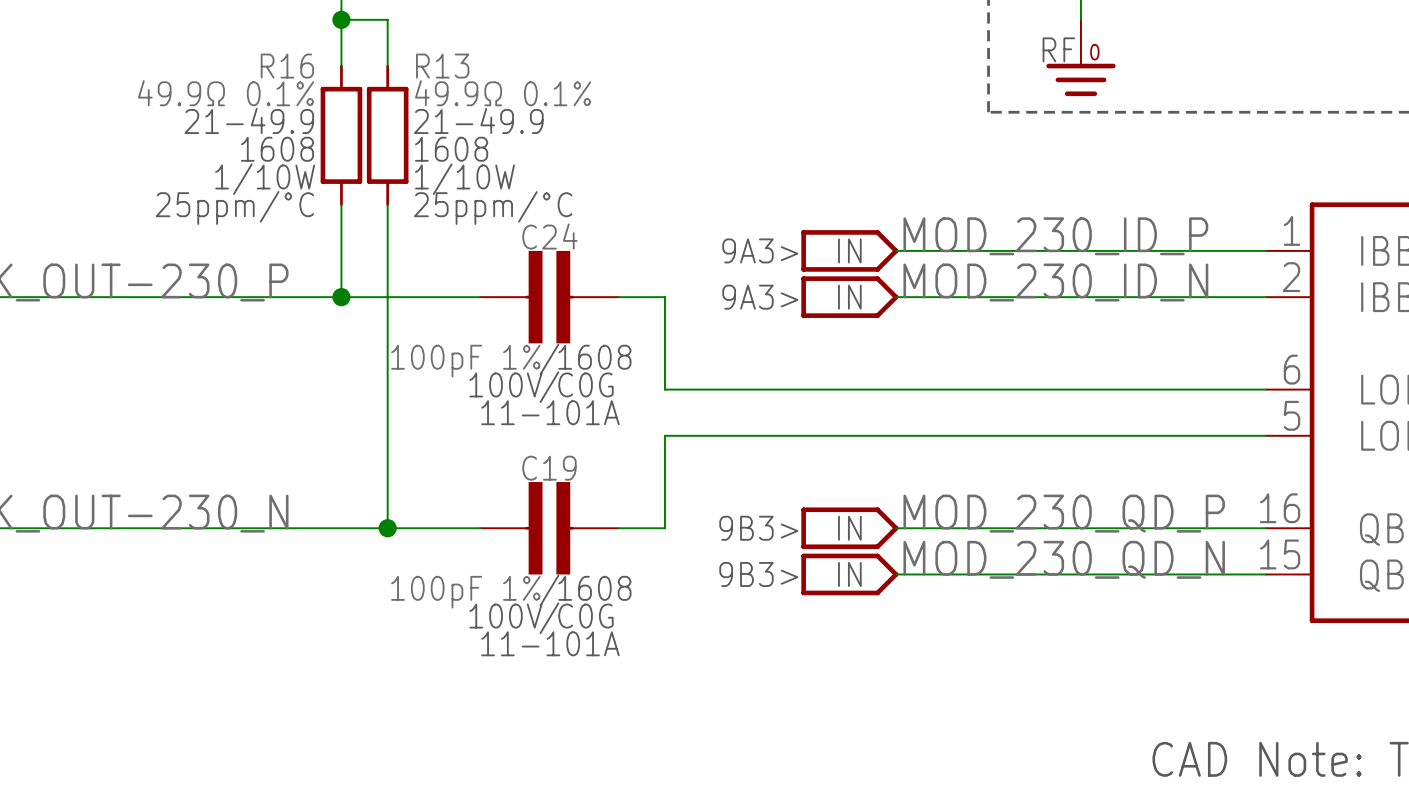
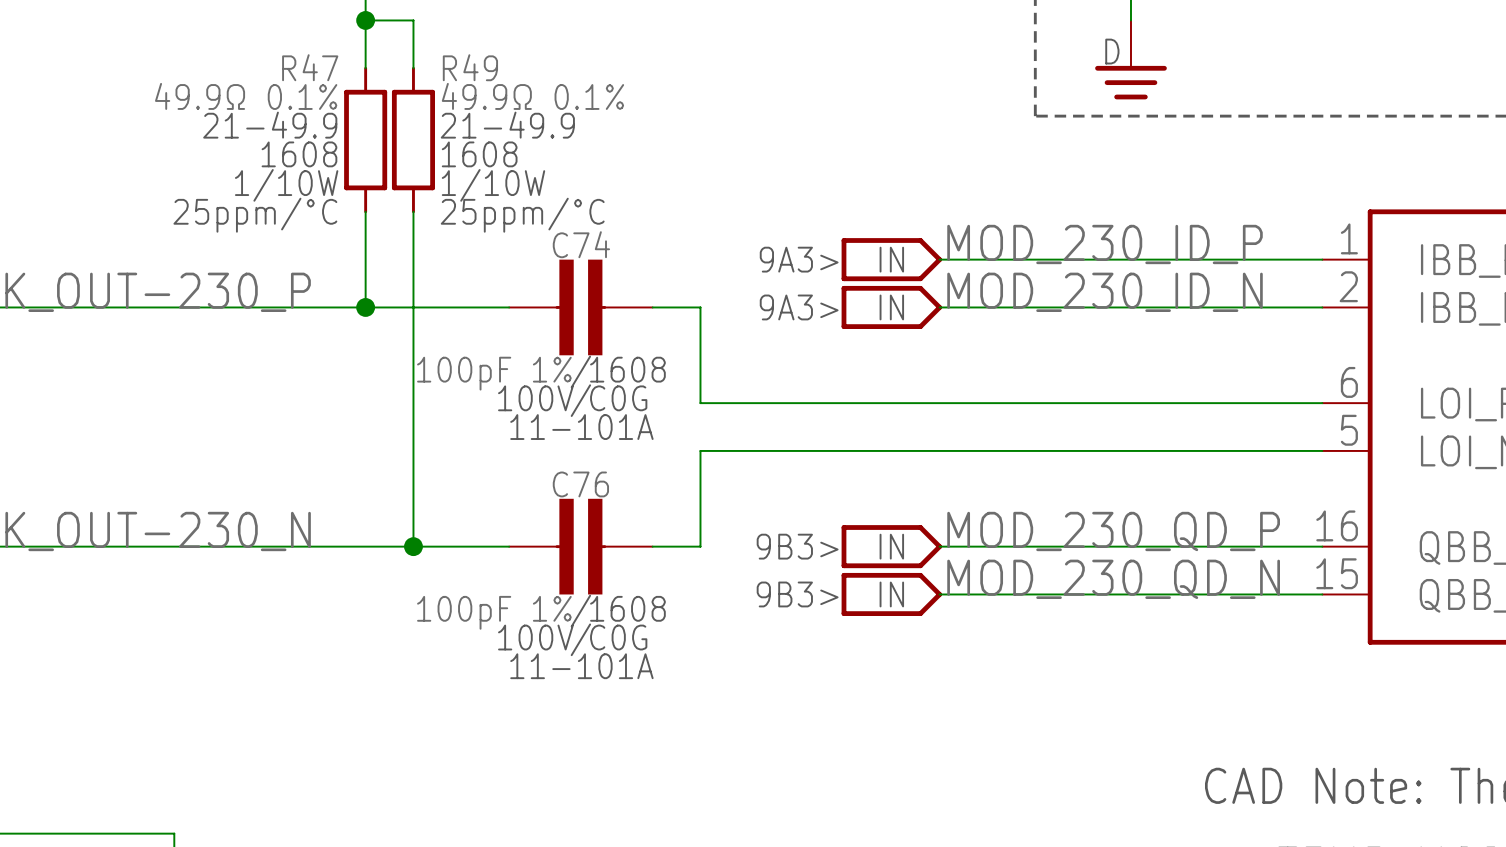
power symbol text: RF (1058, 49) -> none
power symbol text: none -> D (1112, 51)
power symbol text: 0 (1094, 52) -> none
R16 name: R16 (287, 66) -> R47 (310, 67)
R13 name: R13 (442, 66) -> R49 (470, 67)
C24 name: C24 (549, 236) -> C74 (581, 244)
C19 name: C19 (549, 468) -> C76 (580, 484)

